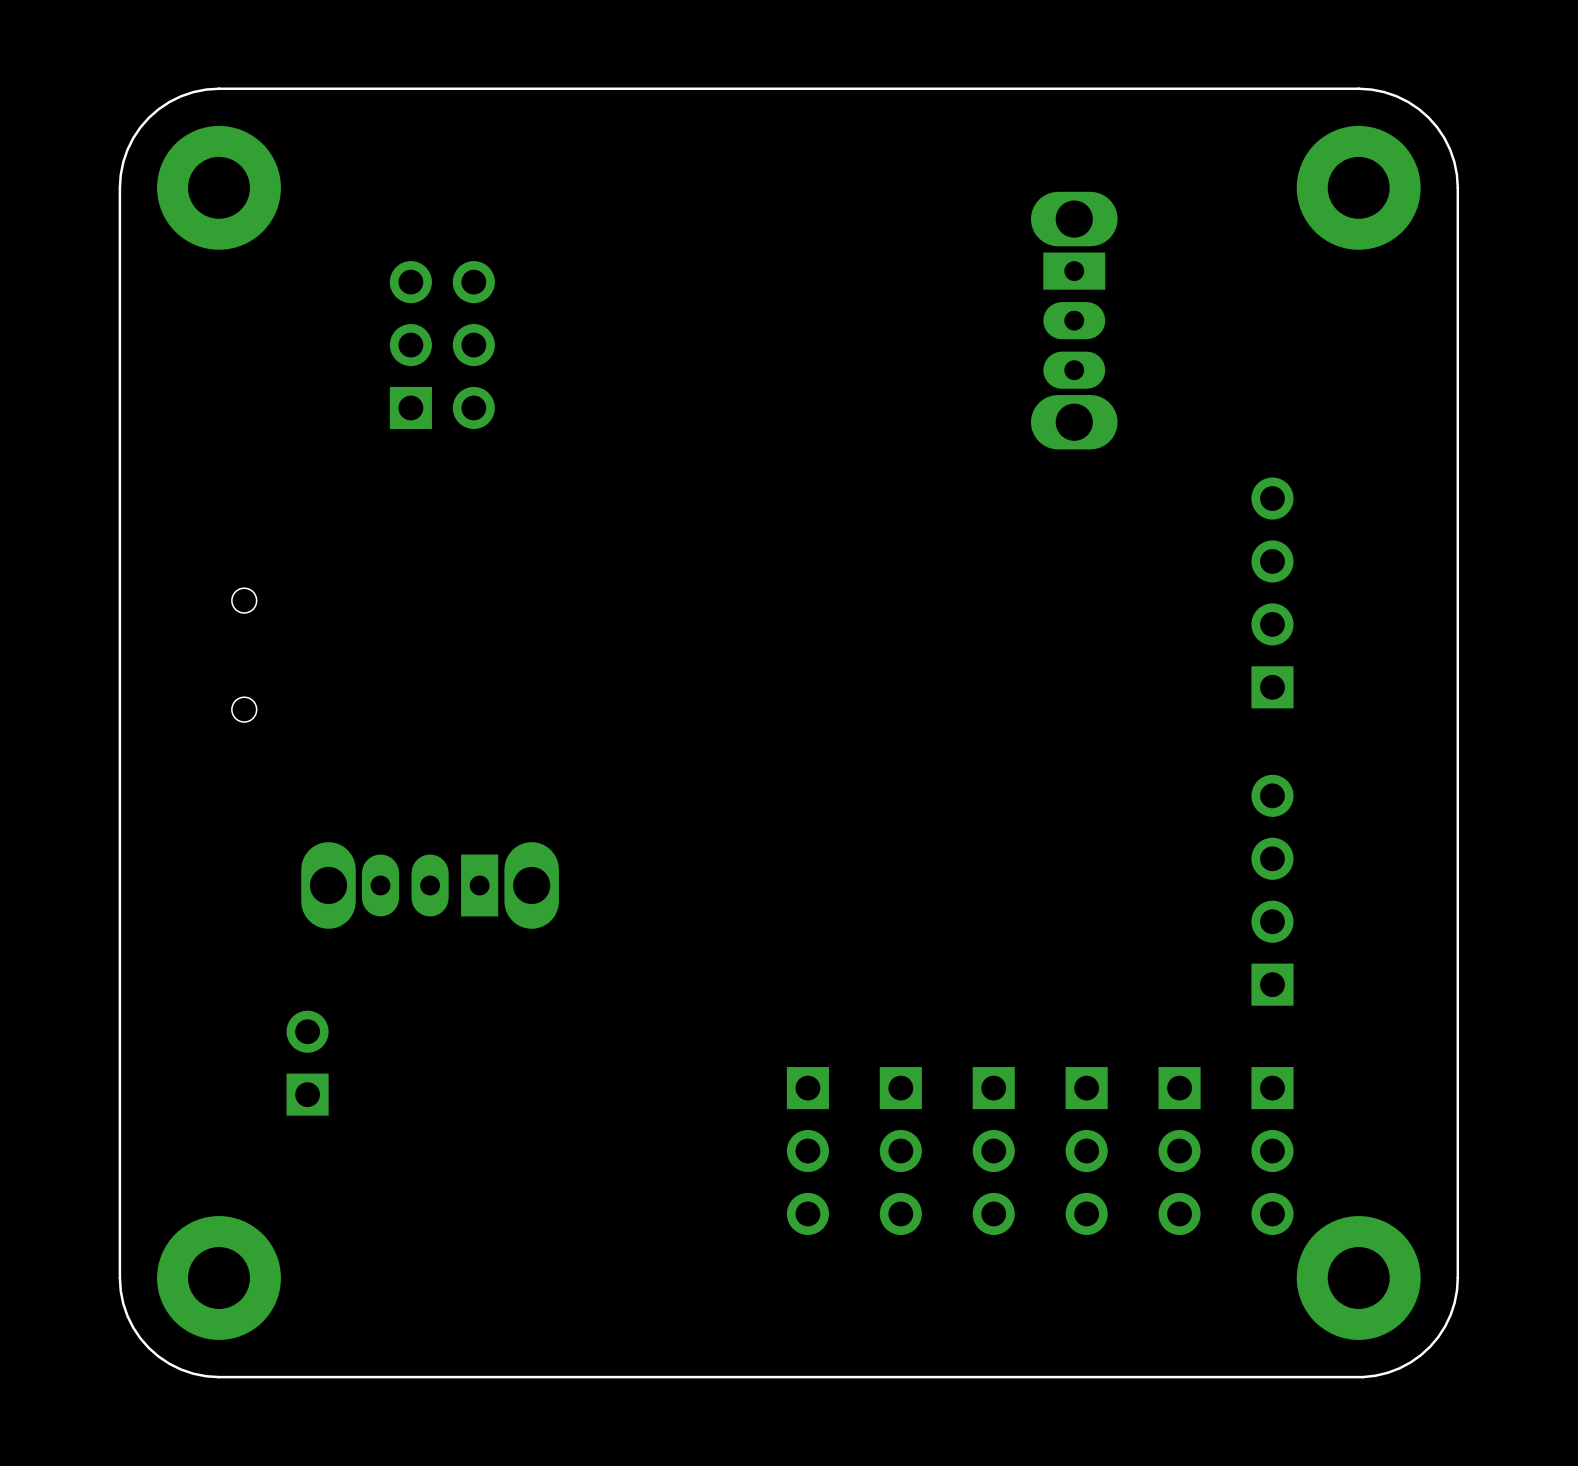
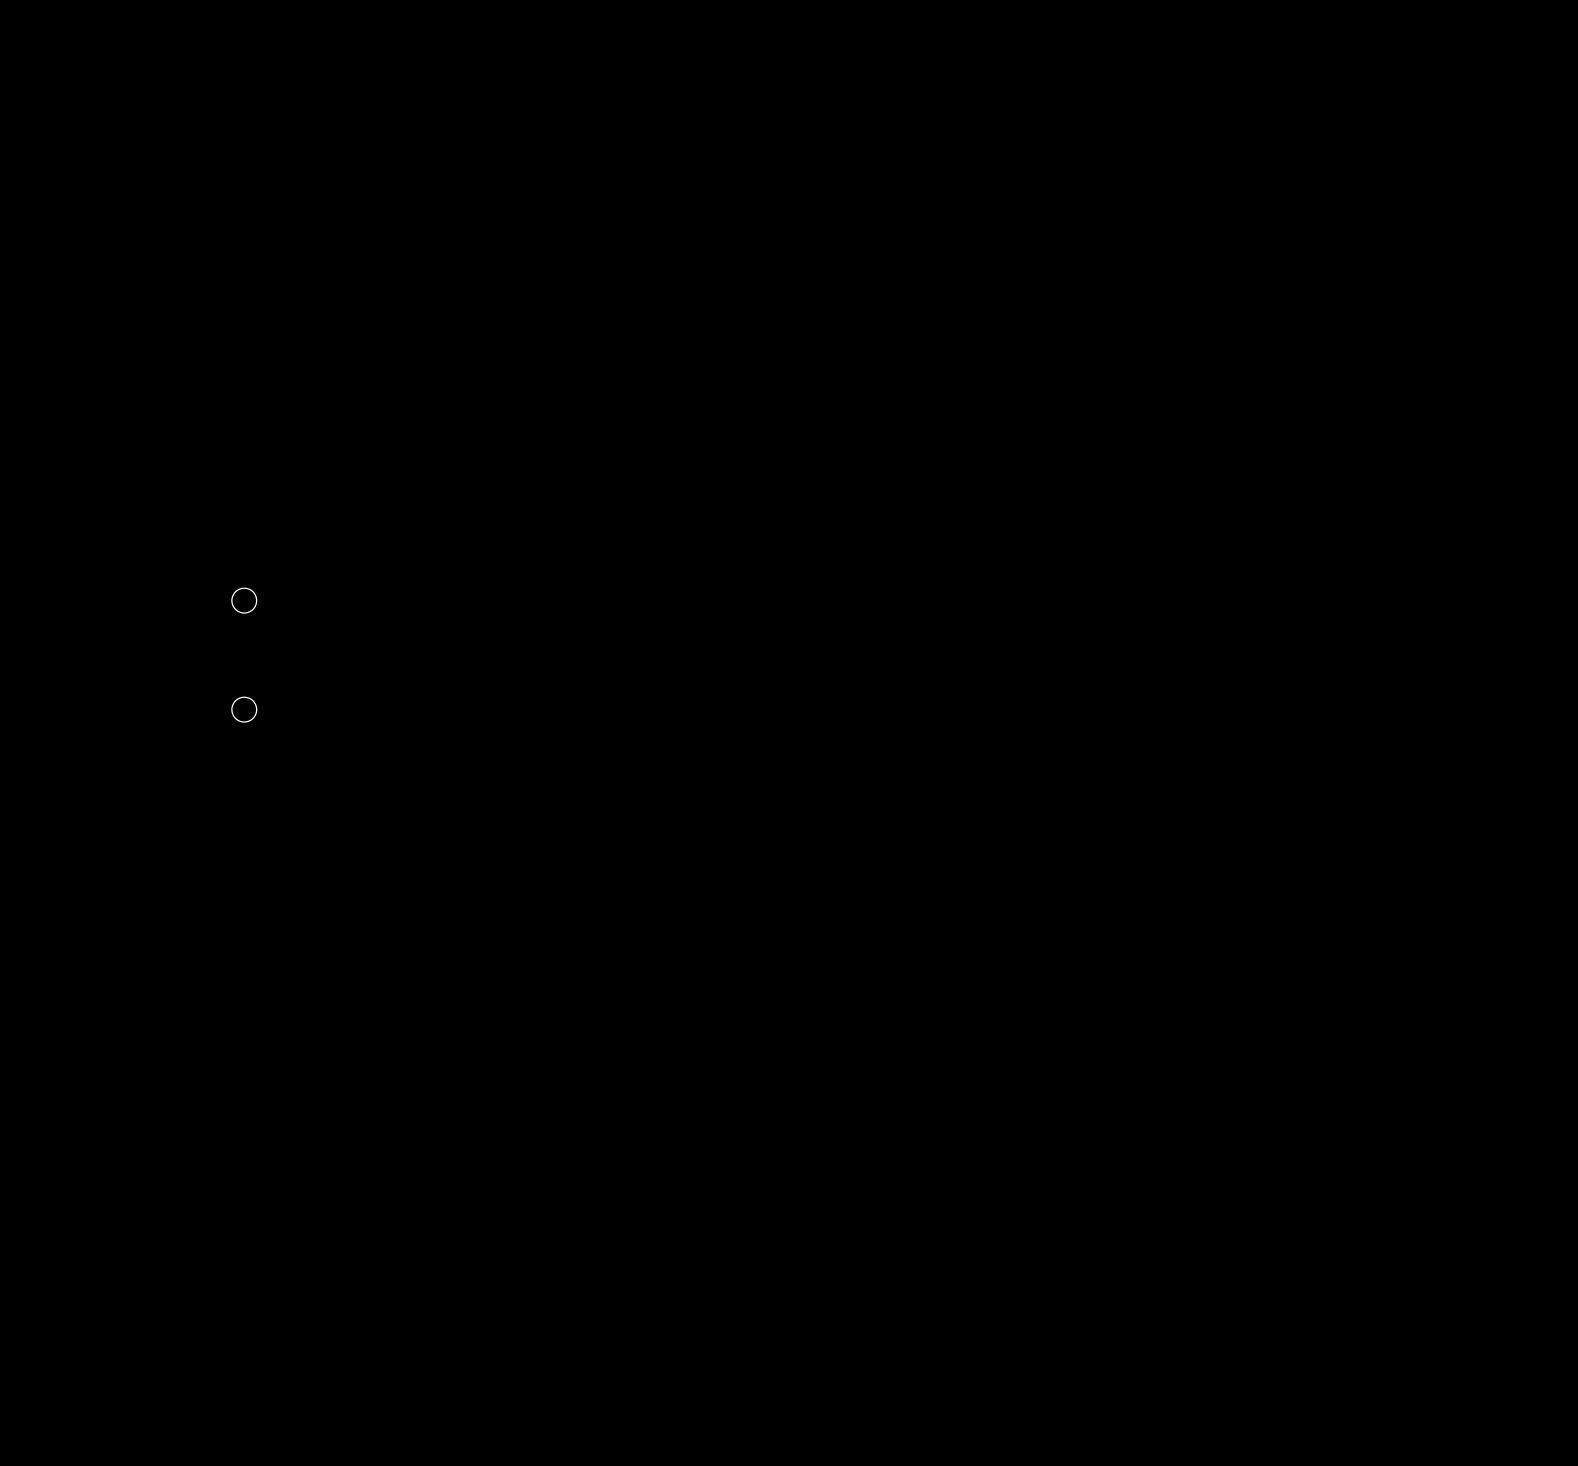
board edge: (1358, 88) (219, 88) (193, 92) (181, 96) (169, 102) (148, 117) (133, 138) (127, 149) (123, 162) (119, 187) (119, 1277) (120, 1290) (127, 1315) (140, 1338) (148, 1348) (169, 1363) (181, 1369) (206, 1376) (219, 1377) (1362, 1377) (1387, 1372) (1399, 1368) (1420, 1355) (1430, 1346) (1438, 1336) (1450, 1314) (1457, 1290) (1457, 1277) (1457, 187) (1454, 162) (1450, 149) (1437, 127) (1428, 117) (1408, 102) (1396, 96) (1384, 92) (1358, 88) -> none
part: (219, 187) -> none
part: (1358, 187) -> none
part: (1074, 320) -> none
part: (442, 345) -> none
part: (1272, 592) -> none
part: (430, 885) -> none
part: (1272, 890) -> none
part: (307, 1063) -> none
part: (807, 1151) -> none
part: (900, 1151) -> none
part: (993, 1151) -> none
part: (1086, 1151) -> none
part: (1179, 1151) -> none
part: (1272, 1151) -> none
part: (219, 1277) -> none
part: (1358, 1277) -> none

